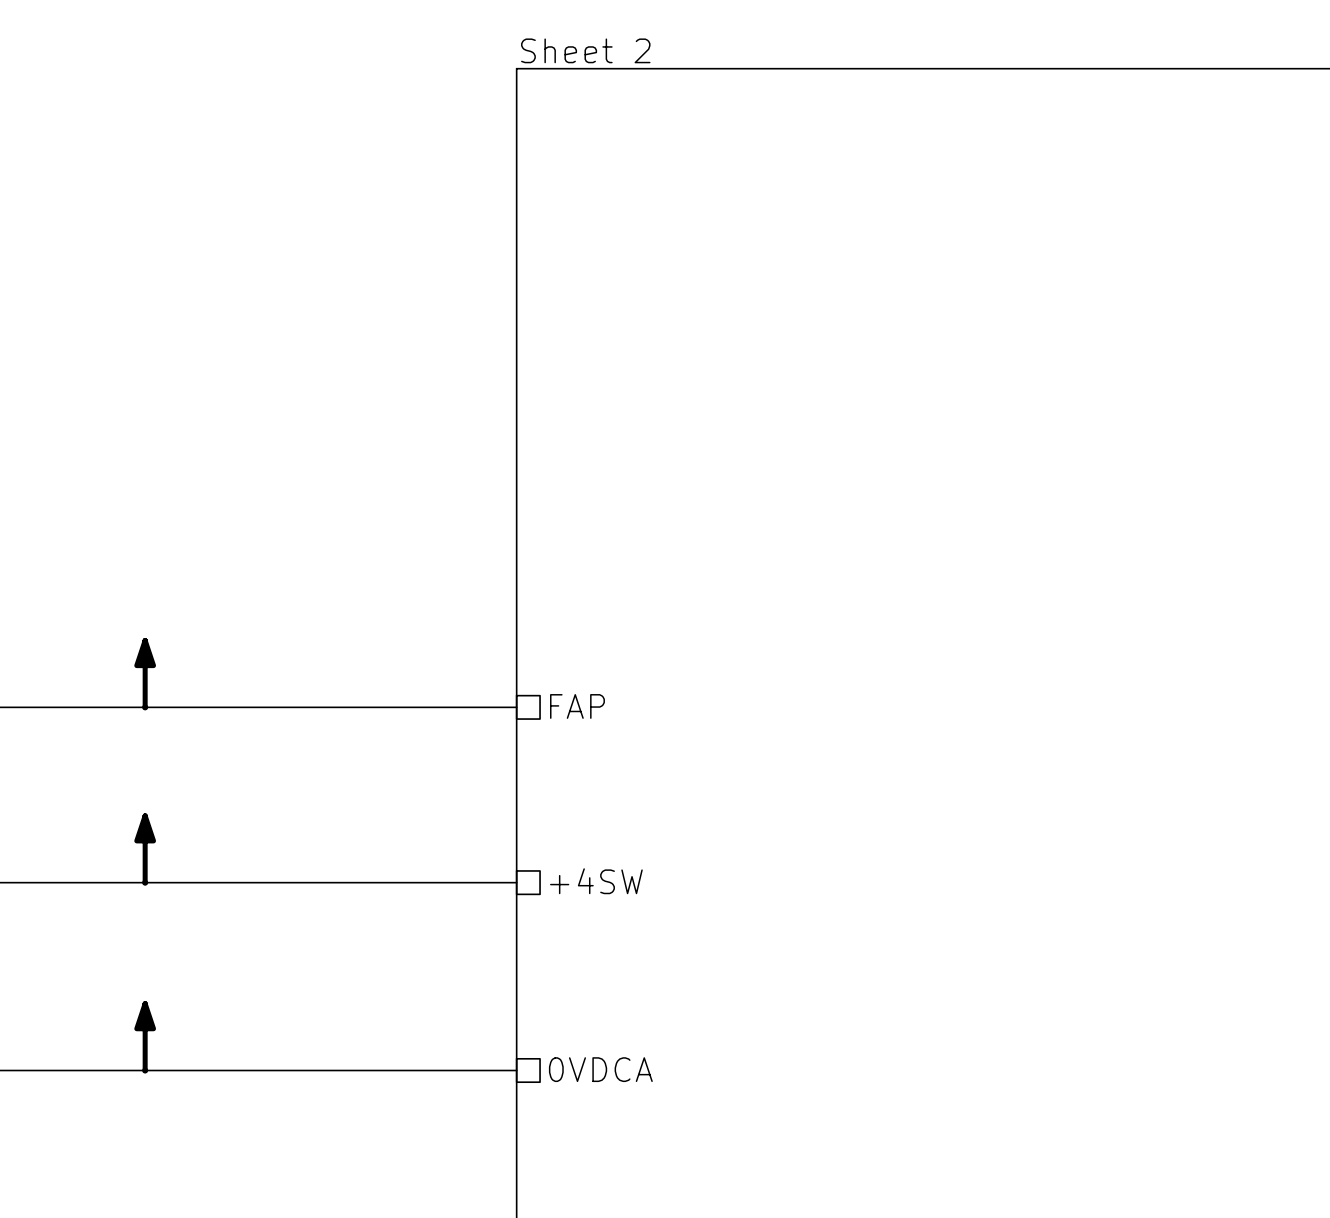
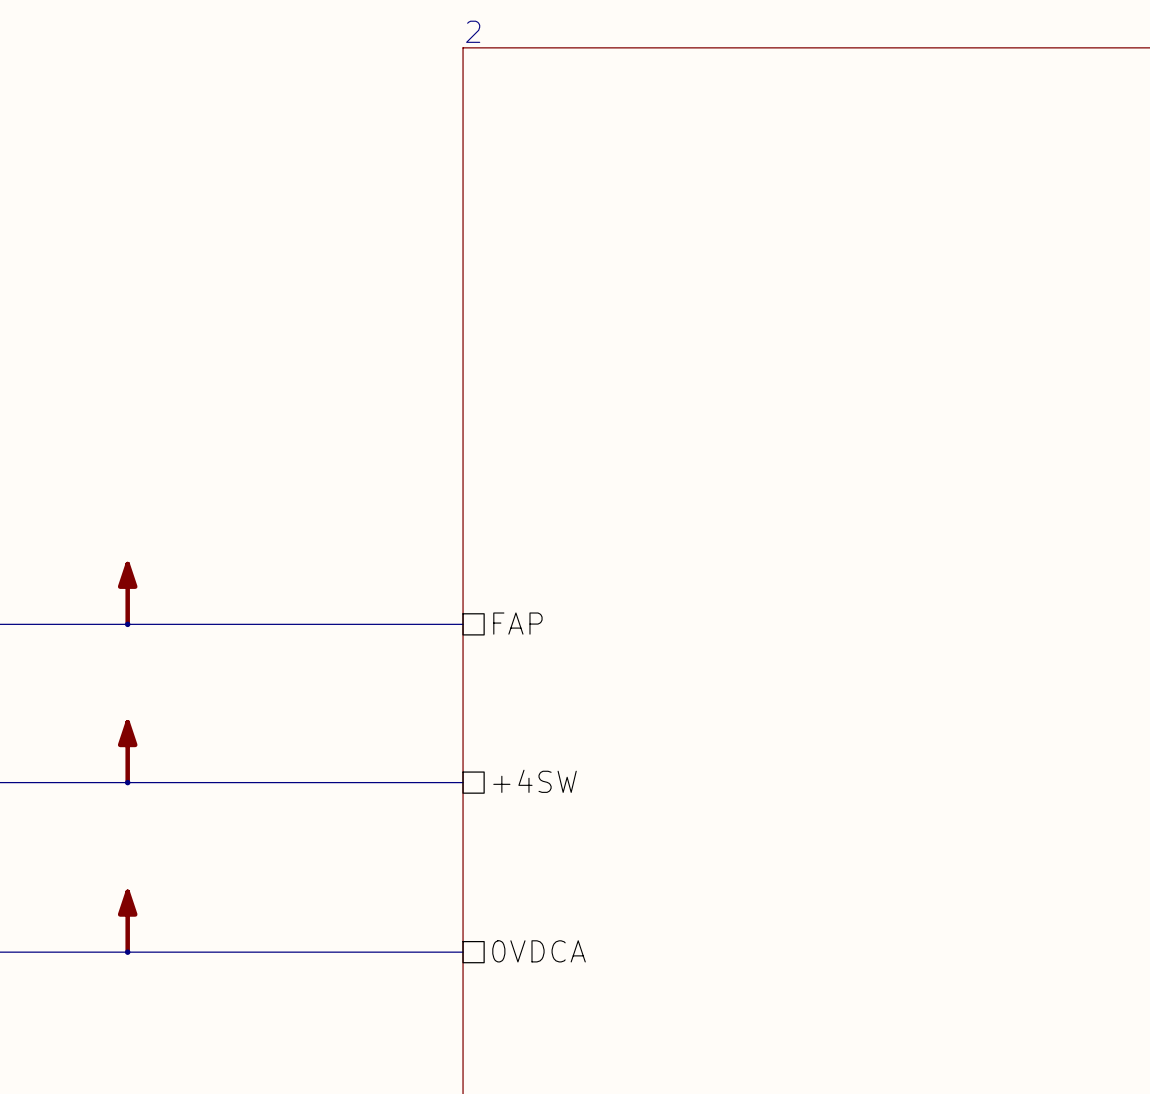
sheet Sheet 2 name: Sheet 2 (585, 50) -> 2 (473, 31)

